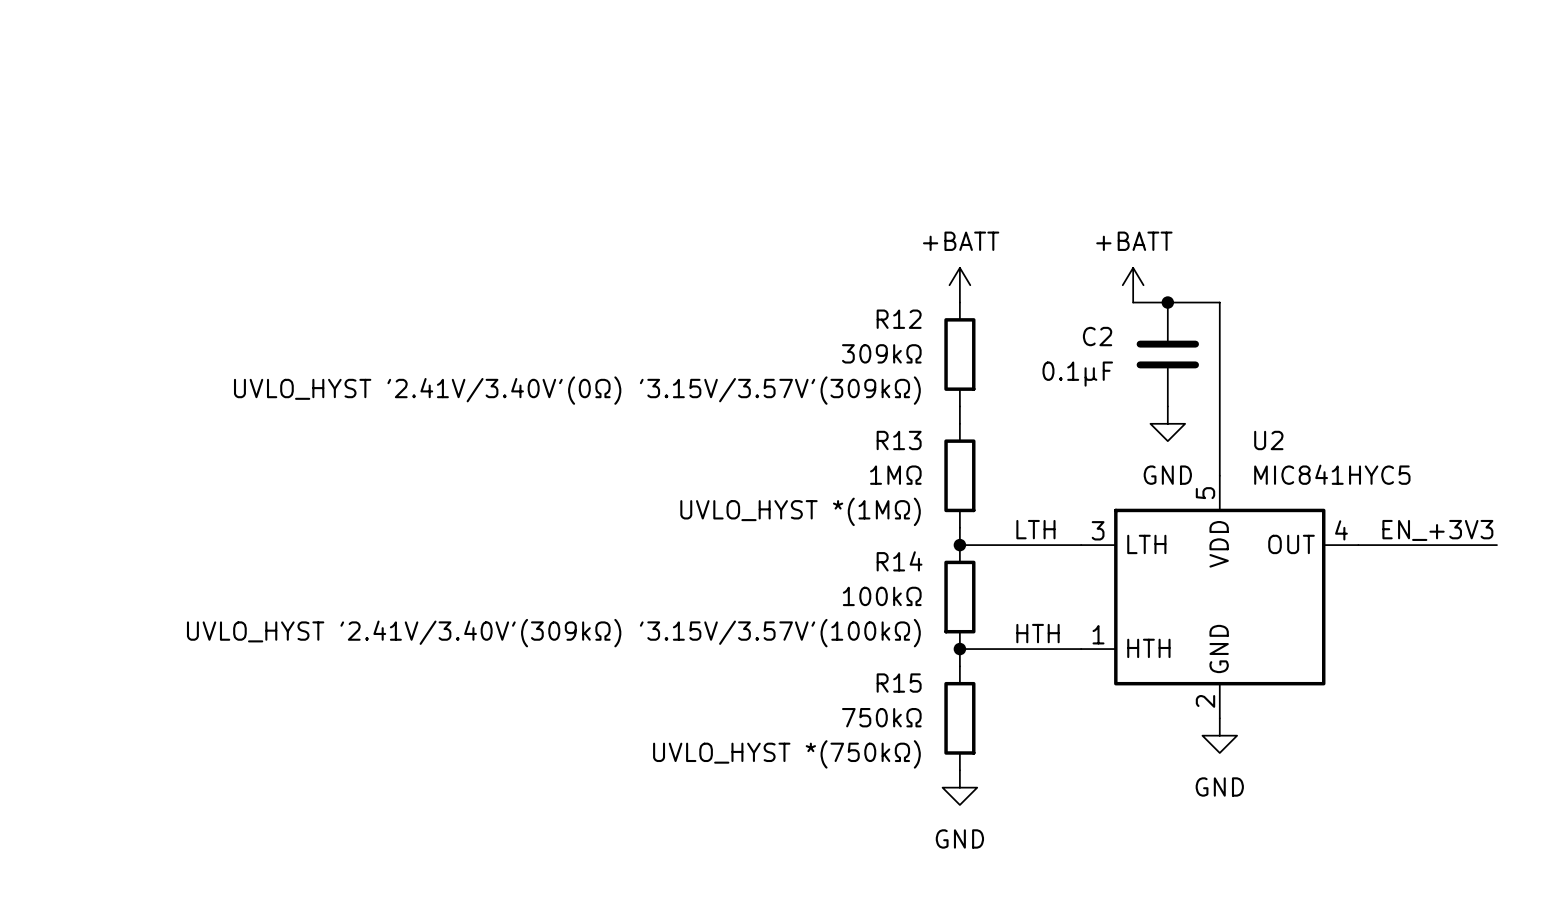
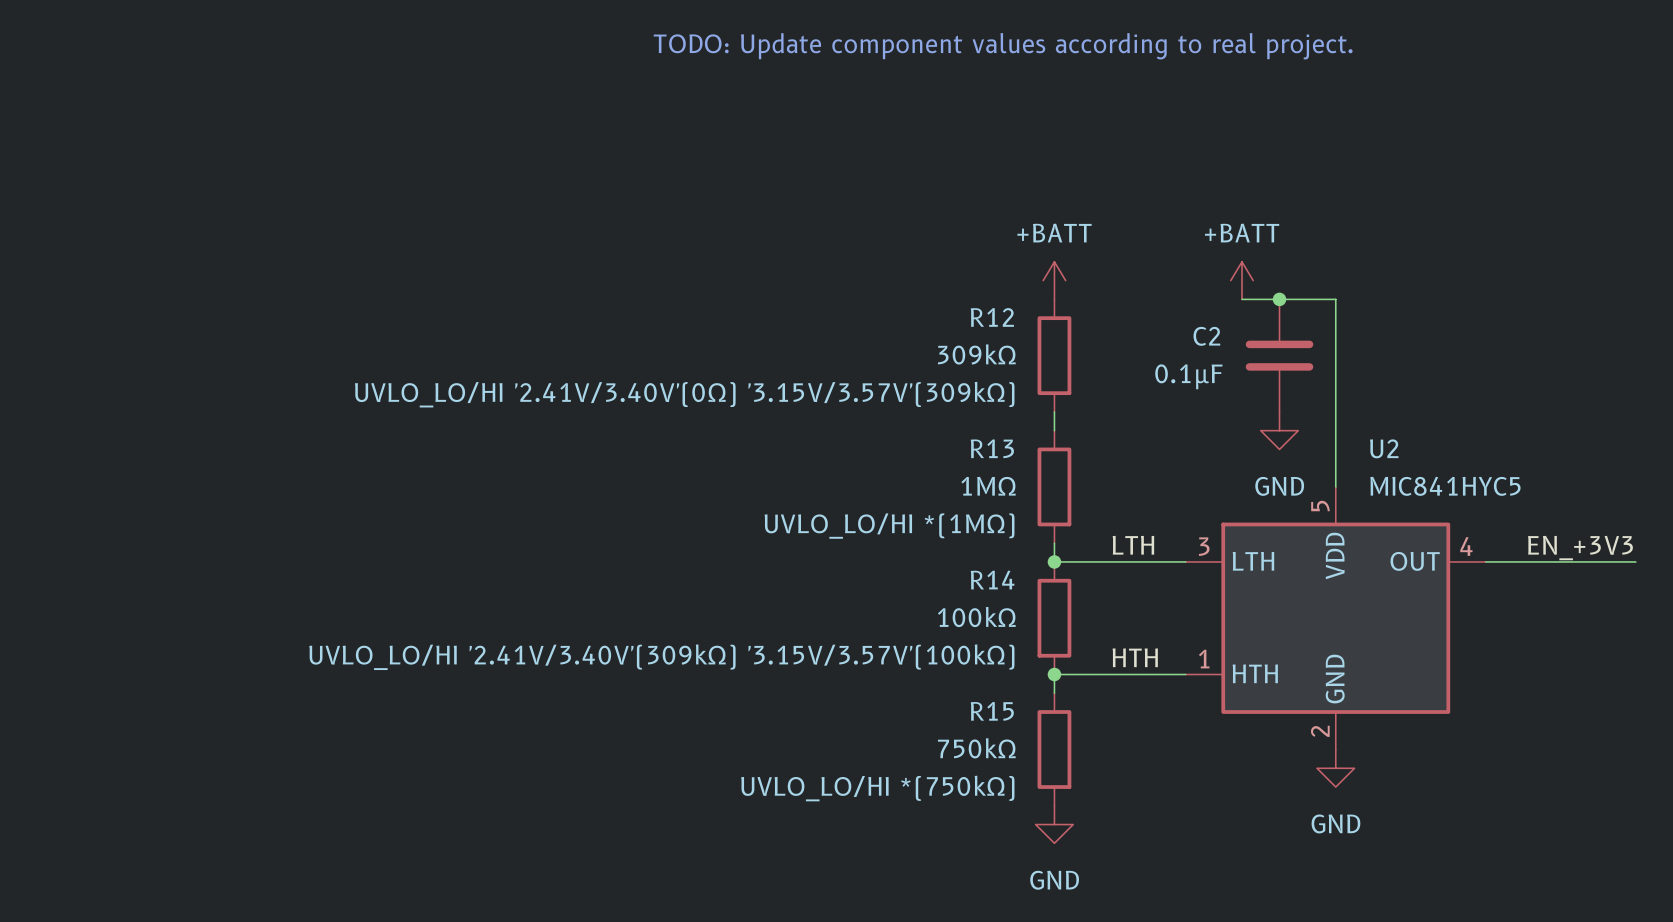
text: none -> TODO: Update component values according to real project. (1003, 46)
R12 text: UVLO_HYST '2.41V/3.40V'(0Ω) '3.15V/3.57V'(309kΩ) (577, 390) -> UVLO_LO/HI '2.41V/3.40V'(0Ω) '3.15V/3.57V'(309kΩ) (684, 394)
R13 text: UVLO_HYST *(1MΩ) (800, 511) -> UVLO_LO/HI *(1MΩ) (889, 526)
R14 text: UVLO_HYST '2.41V/3.40V'(309kΩ) '3.15V/3.57V'(100kΩ) (553, 633) -> UVLO_LO/HI '2.41V/3.40V'(309kΩ) '3.15V/3.57V'(100kΩ) (661, 657)
R15 text: UVLO_HYST *(750kΩ) (786, 754) -> UVLO_LO/HI *(750kΩ) (877, 788)

